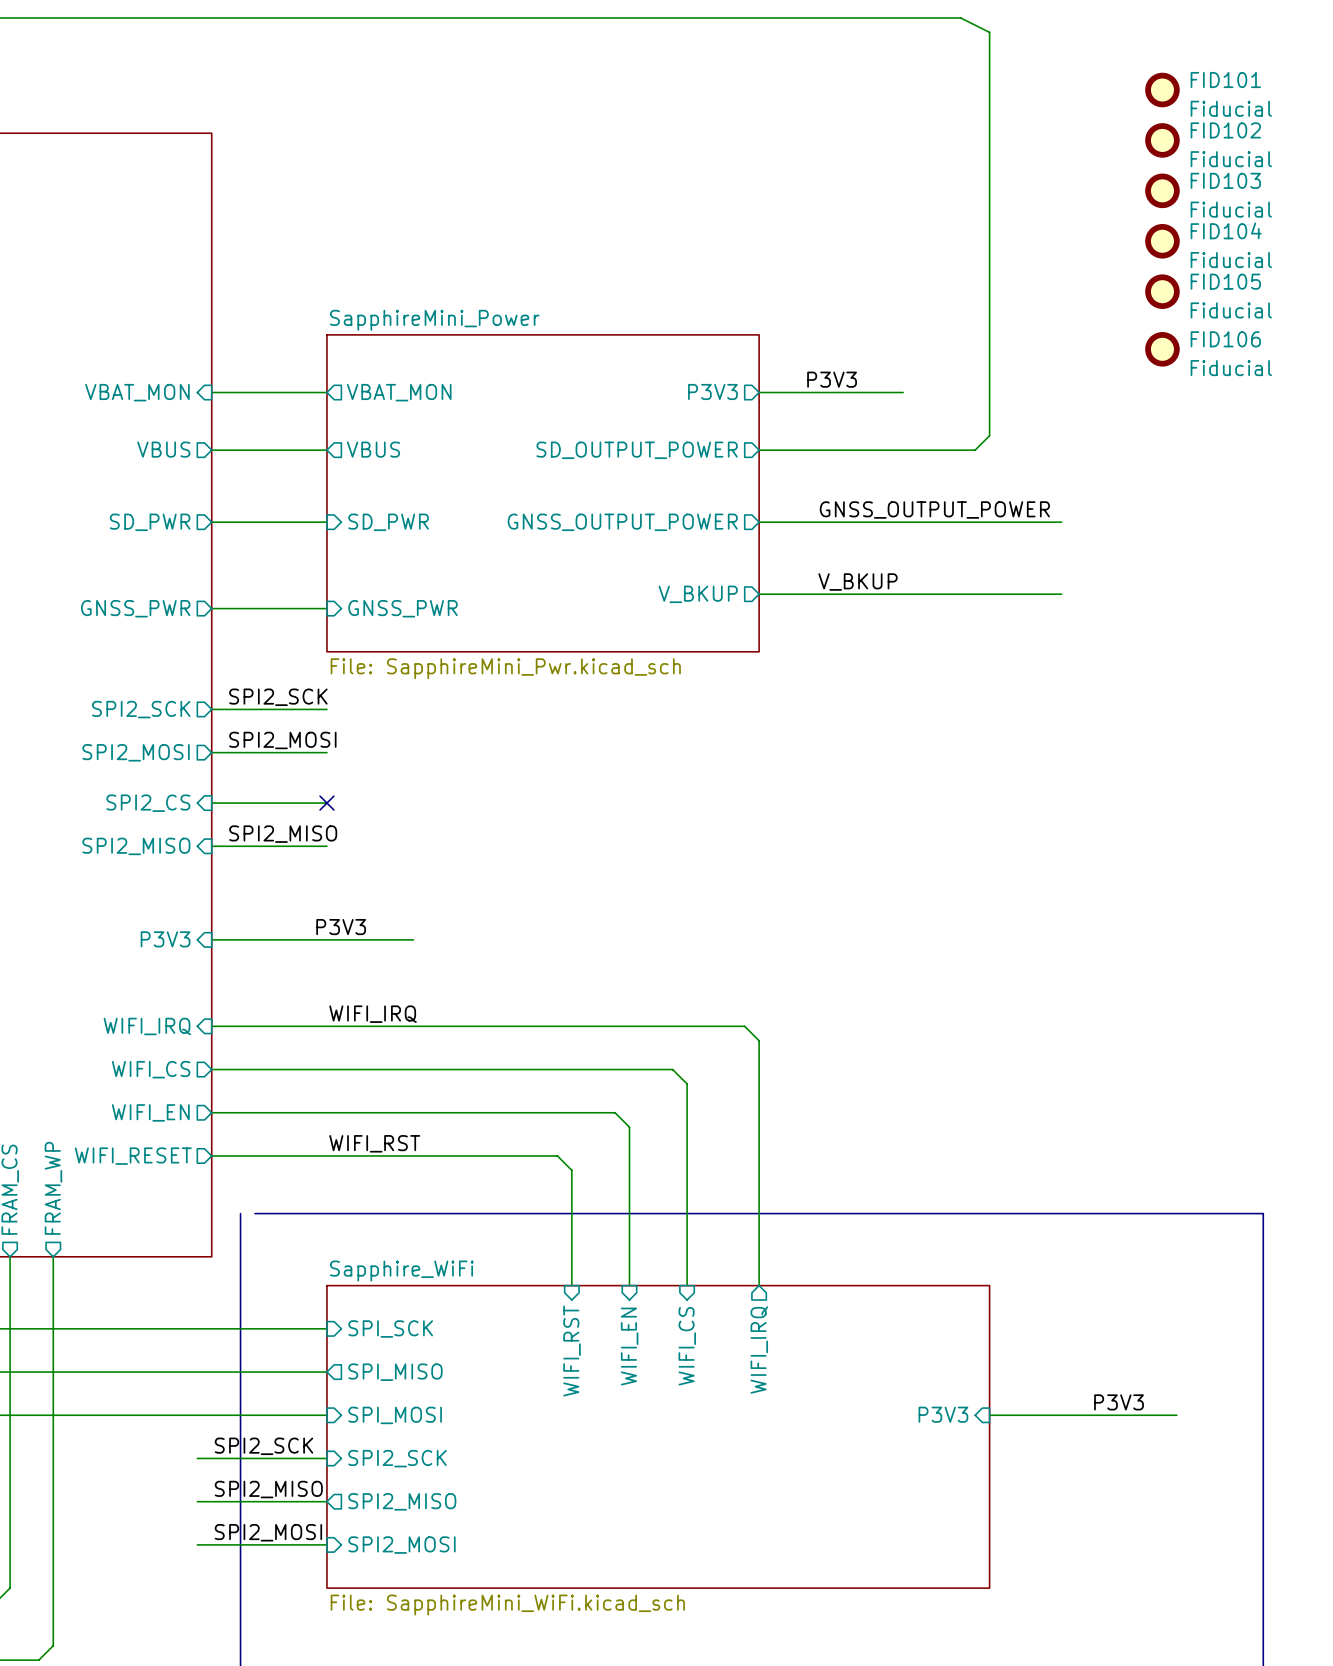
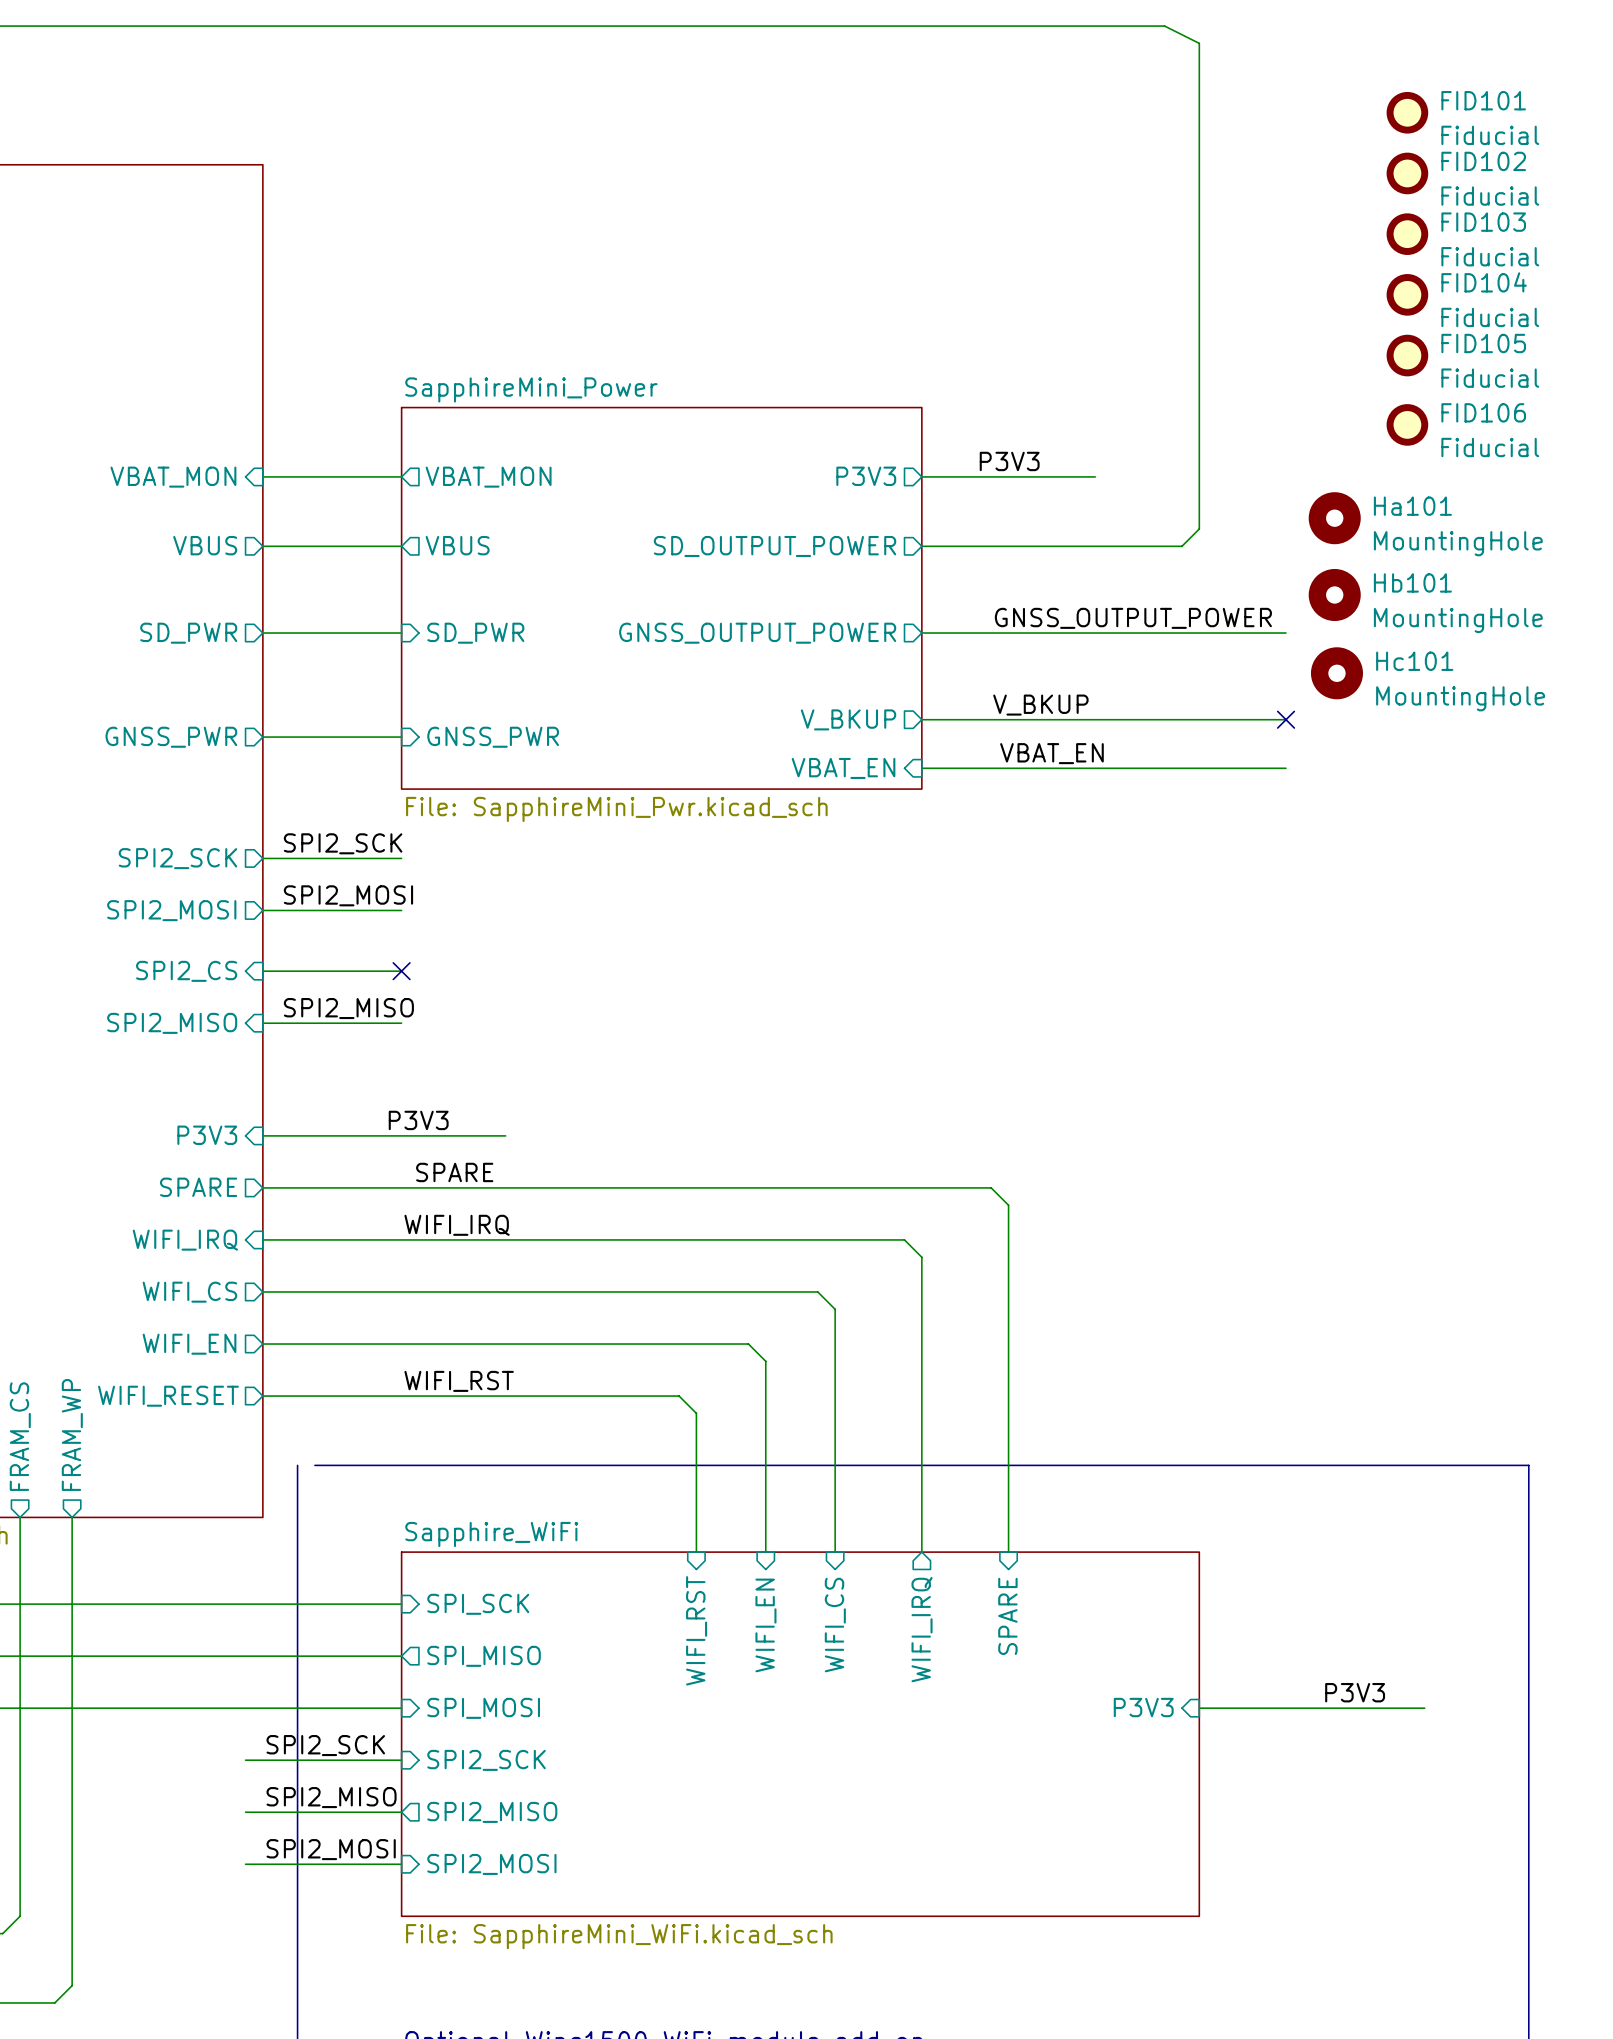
Ha101: none -> MountingHole (1334, 518)
Hb101: none -> MountingHole (1334, 594)
Hc101: none -> MountingHole (1336, 673)
no-connect mark: none -> (1286, 719)
label: none -> VBAT_EN (1051, 753)
sheet pin: none -> VBAT_EN (843, 768)
wire: none -> (921, 768) (1286, 768)
label: none -> SPARE (454, 1172)
sheet pin: none -> SPARE (198, 1187)
wire: none -> (262, 1187) (991, 1187) (1008, 1205) (1008, 1552)
sheet pin: none -> SPARE (1007, 1616)

